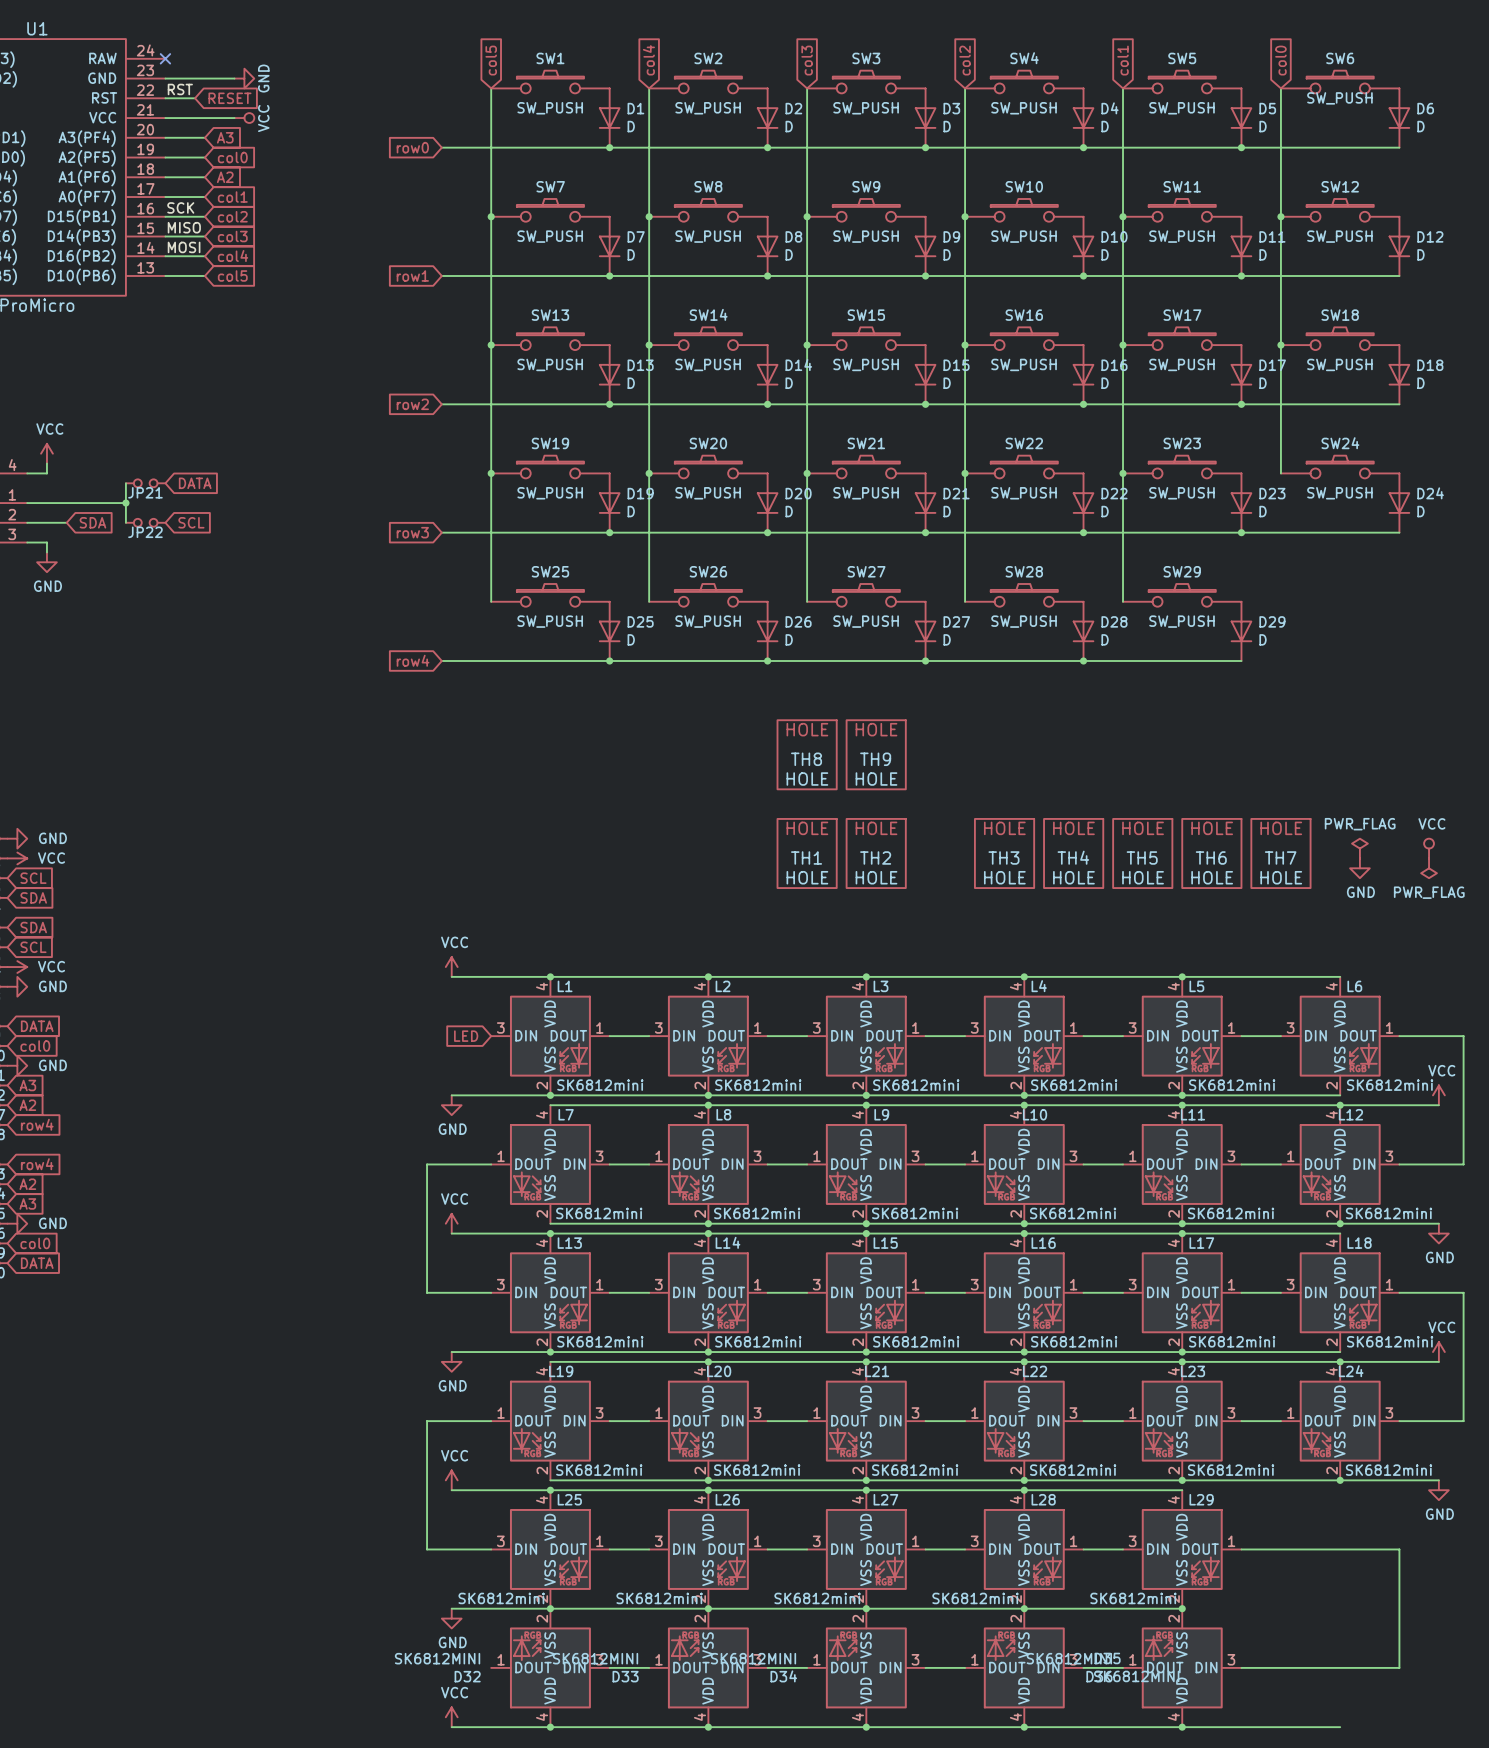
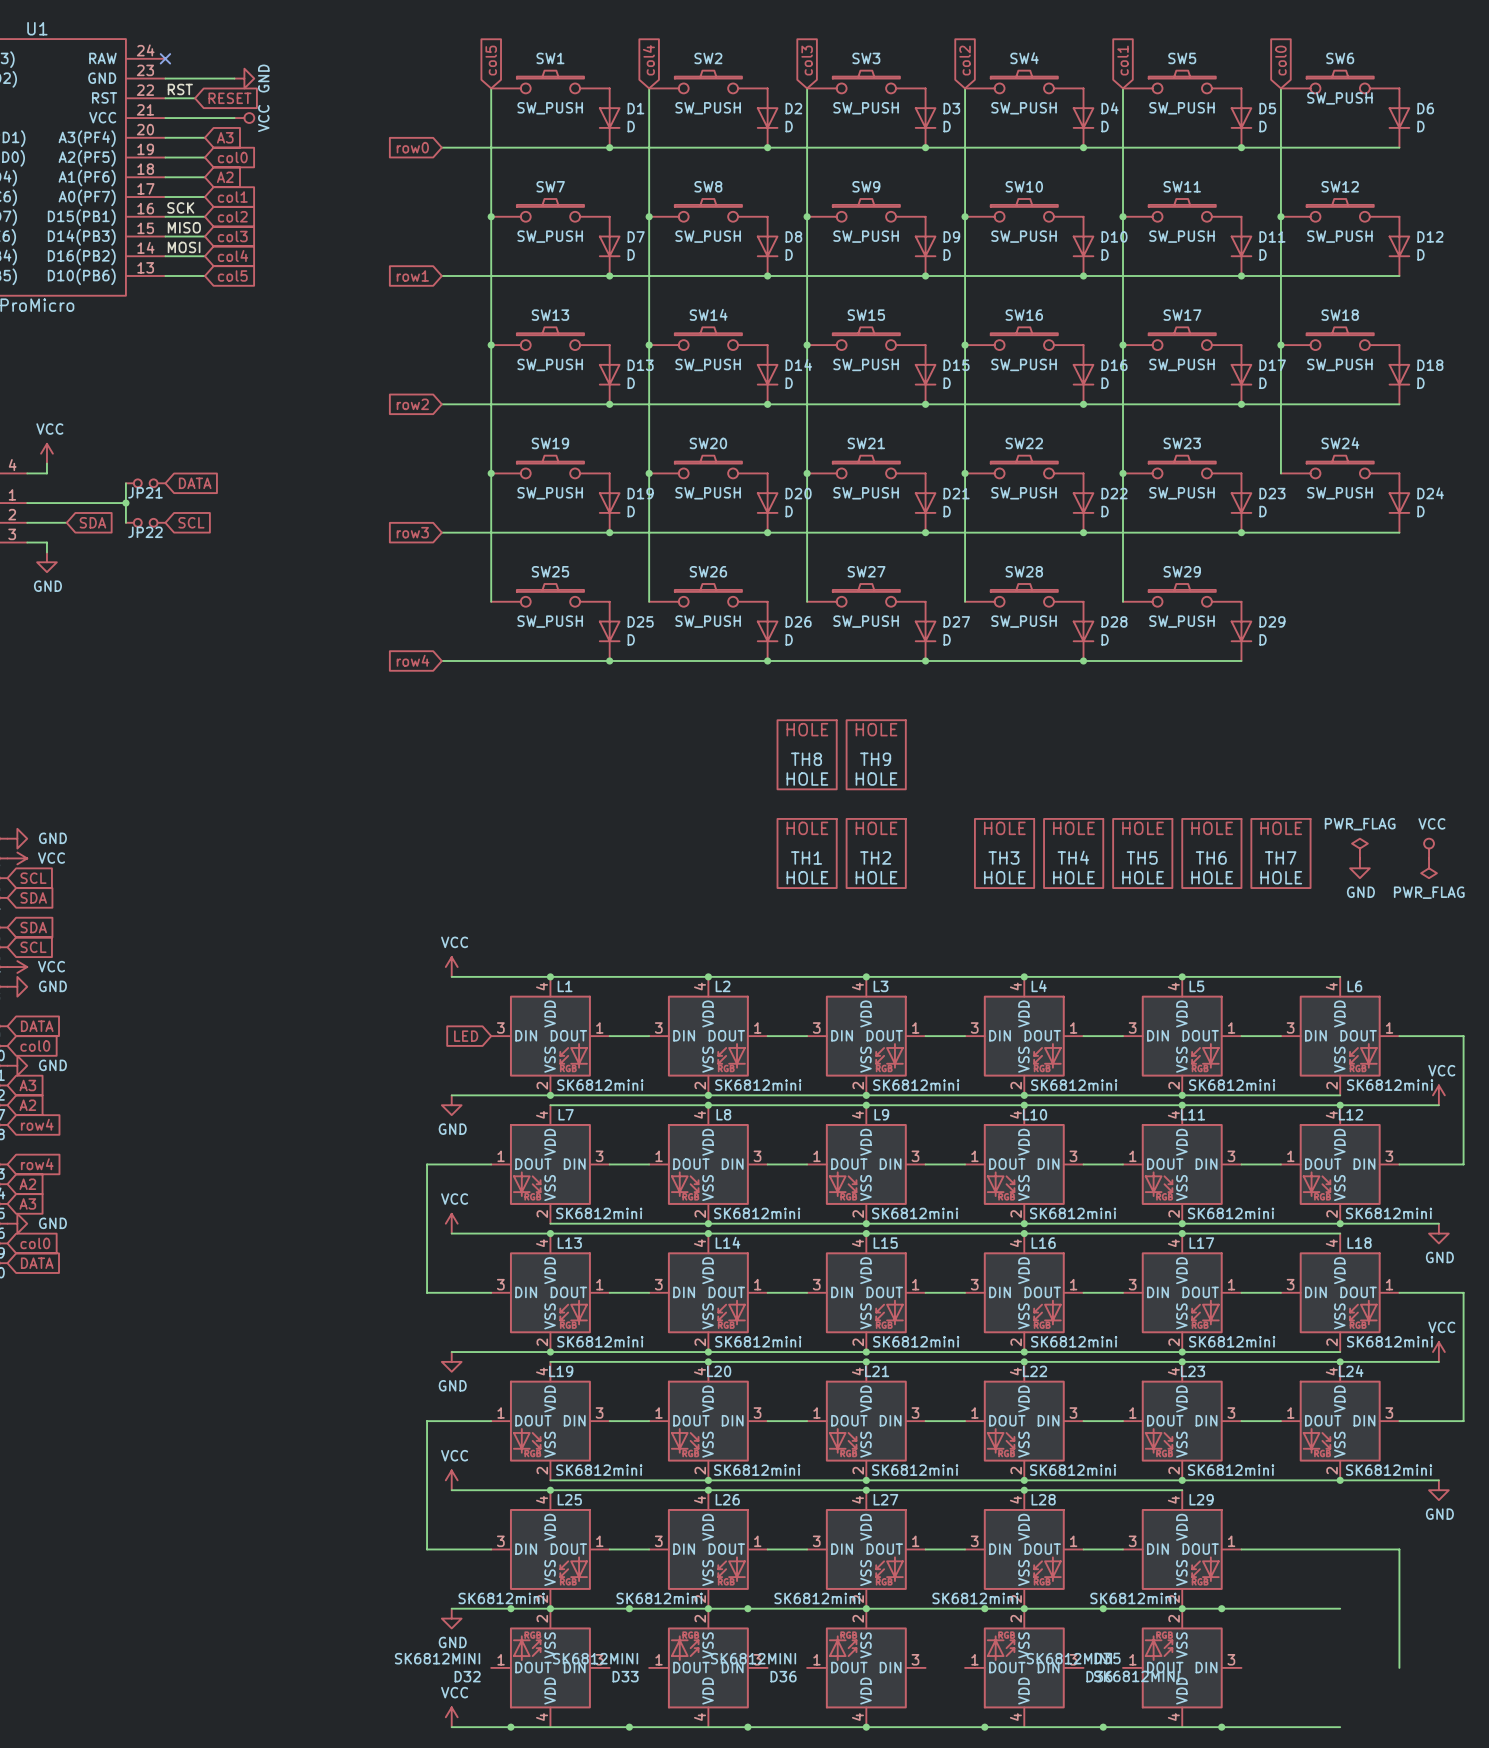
junction: none -> (510, 1608)
junction: none -> (629, 1608)
junction: none -> (747, 1608)
junction: none -> (984, 1608)
junction: none -> (1103, 1608)
junction: none -> (1221, 1608)
wire: (609, 1667) (649, 1667) -> none
wire: (767, 1667) (807, 1667) -> none
wire: (925, 1667) (965, 1667) -> none
wire: (1083, 1667) (1123, 1667) -> none
wire: (1241, 1667) (1399, 1667) -> (1182, 1608) (1340, 1608)
D34 name: D34 (783, 1676) -> D36 (783, 1676)
junction: none -> (510, 1727)
junction: (550, 1727) -> none
junction: none -> (629, 1727)
junction: (708, 1727) -> none
junction: none -> (747, 1727)
junction: none -> (984, 1727)
junction: (1024, 1727) -> none
junction: none -> (1103, 1727)
junction: (1182, 1727) -> none
junction: none -> (1221, 1727)

